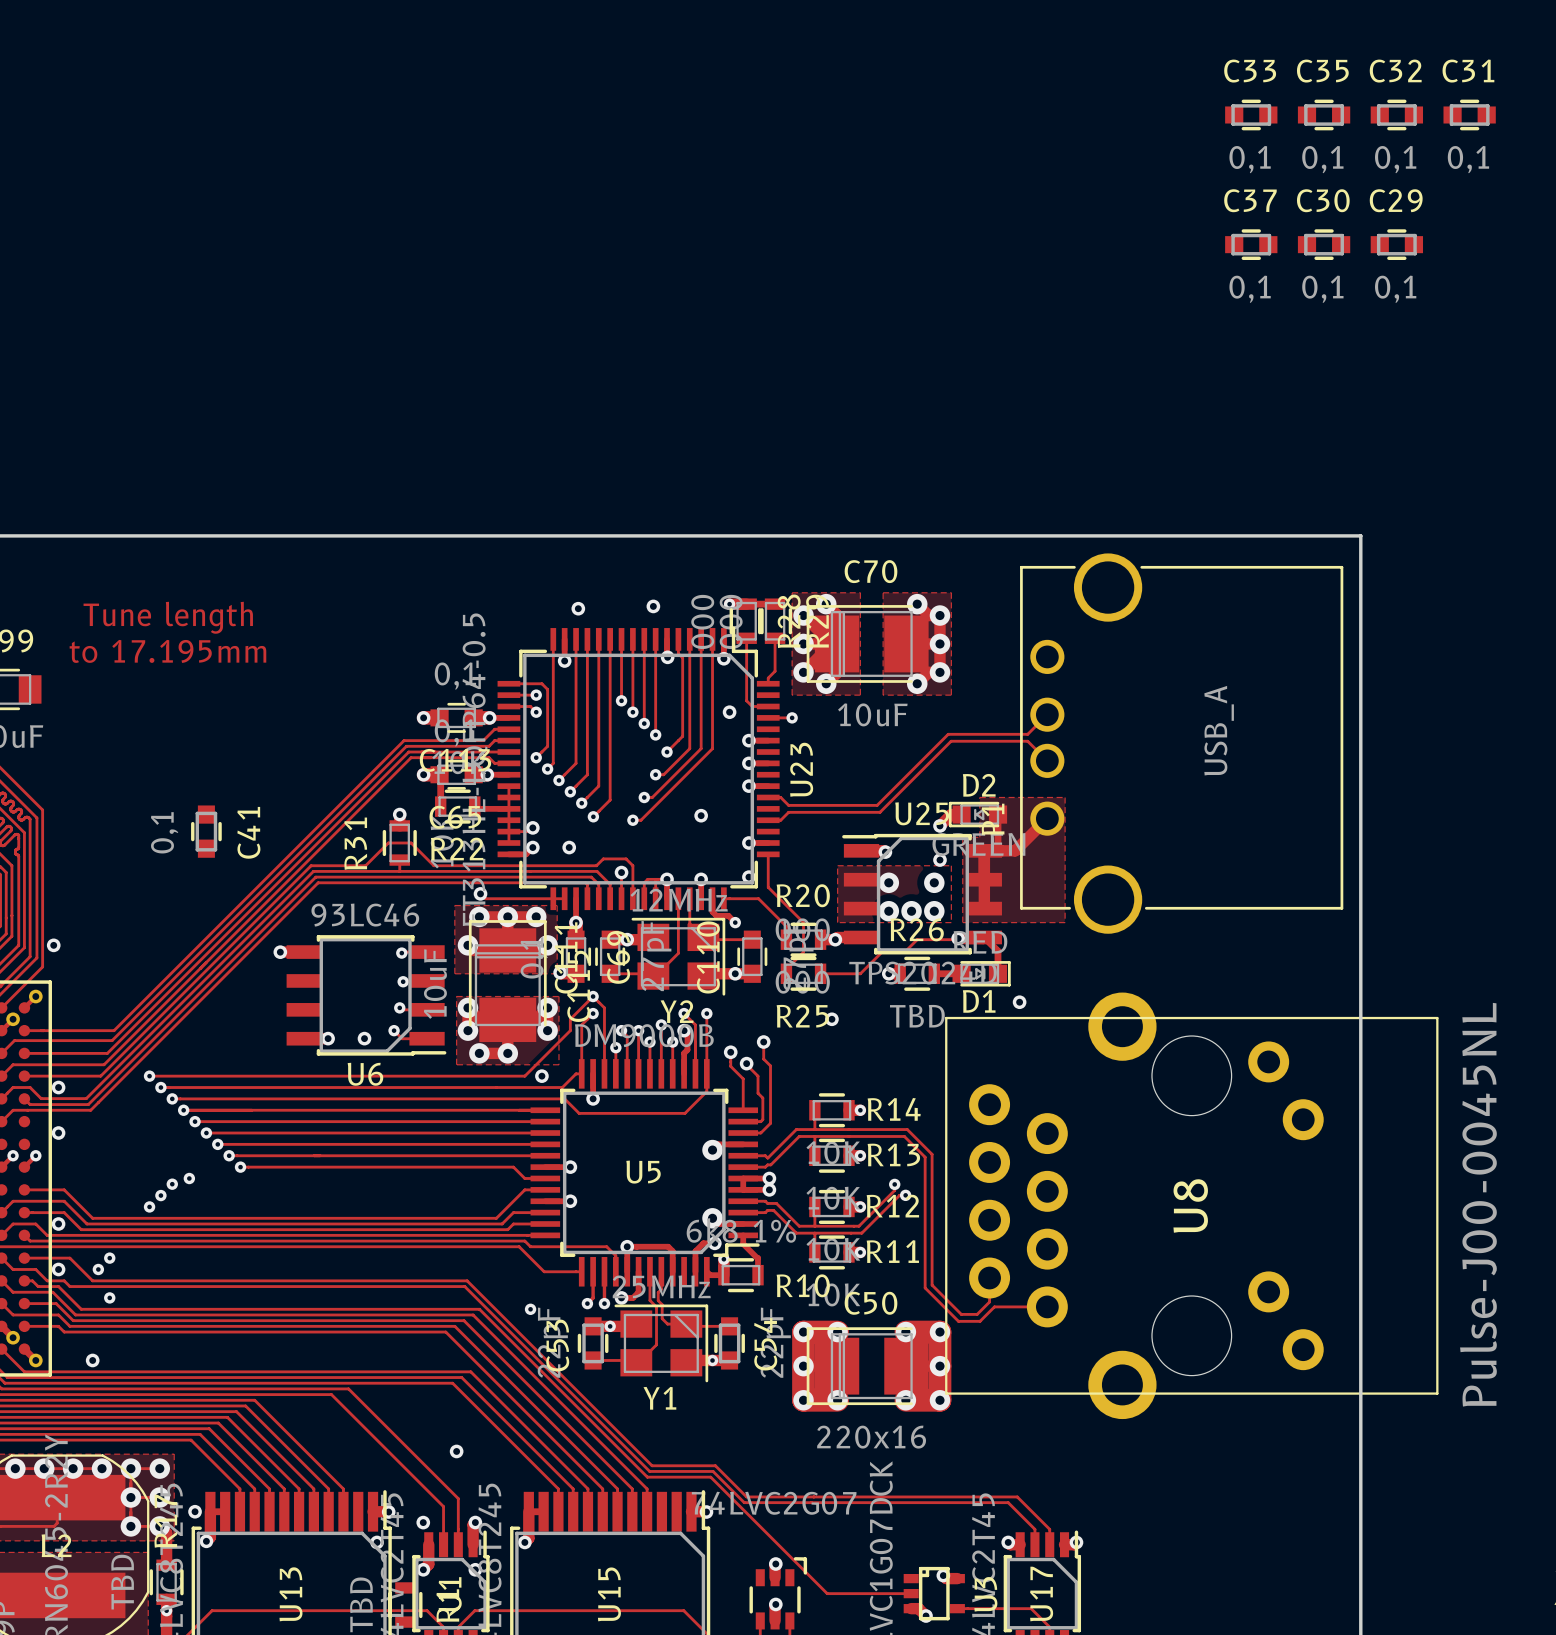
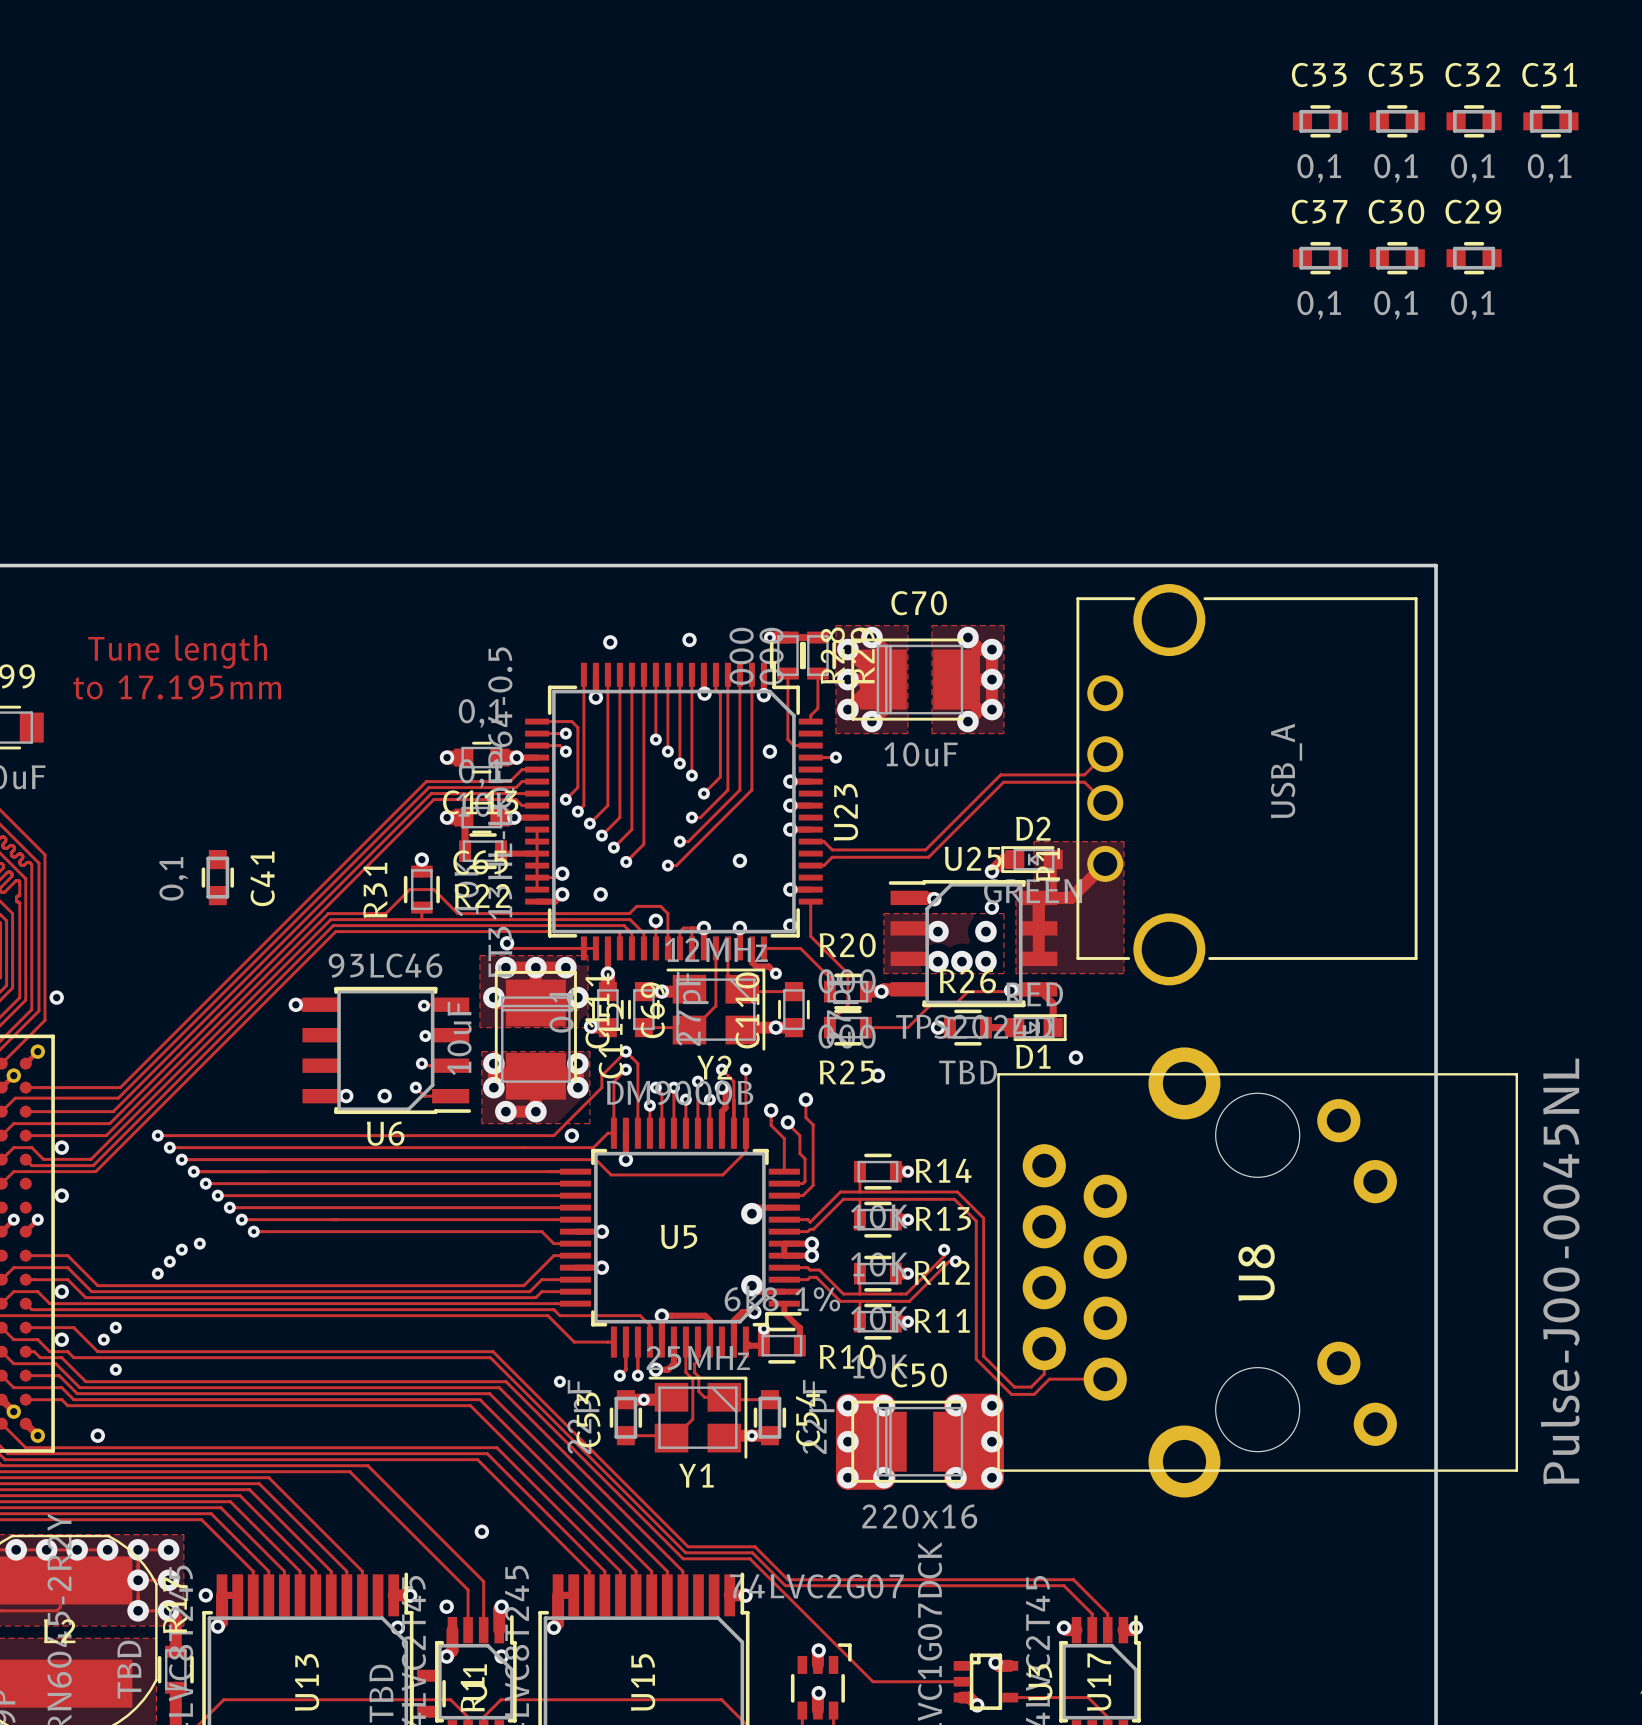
via: (166, 1610) -> none

